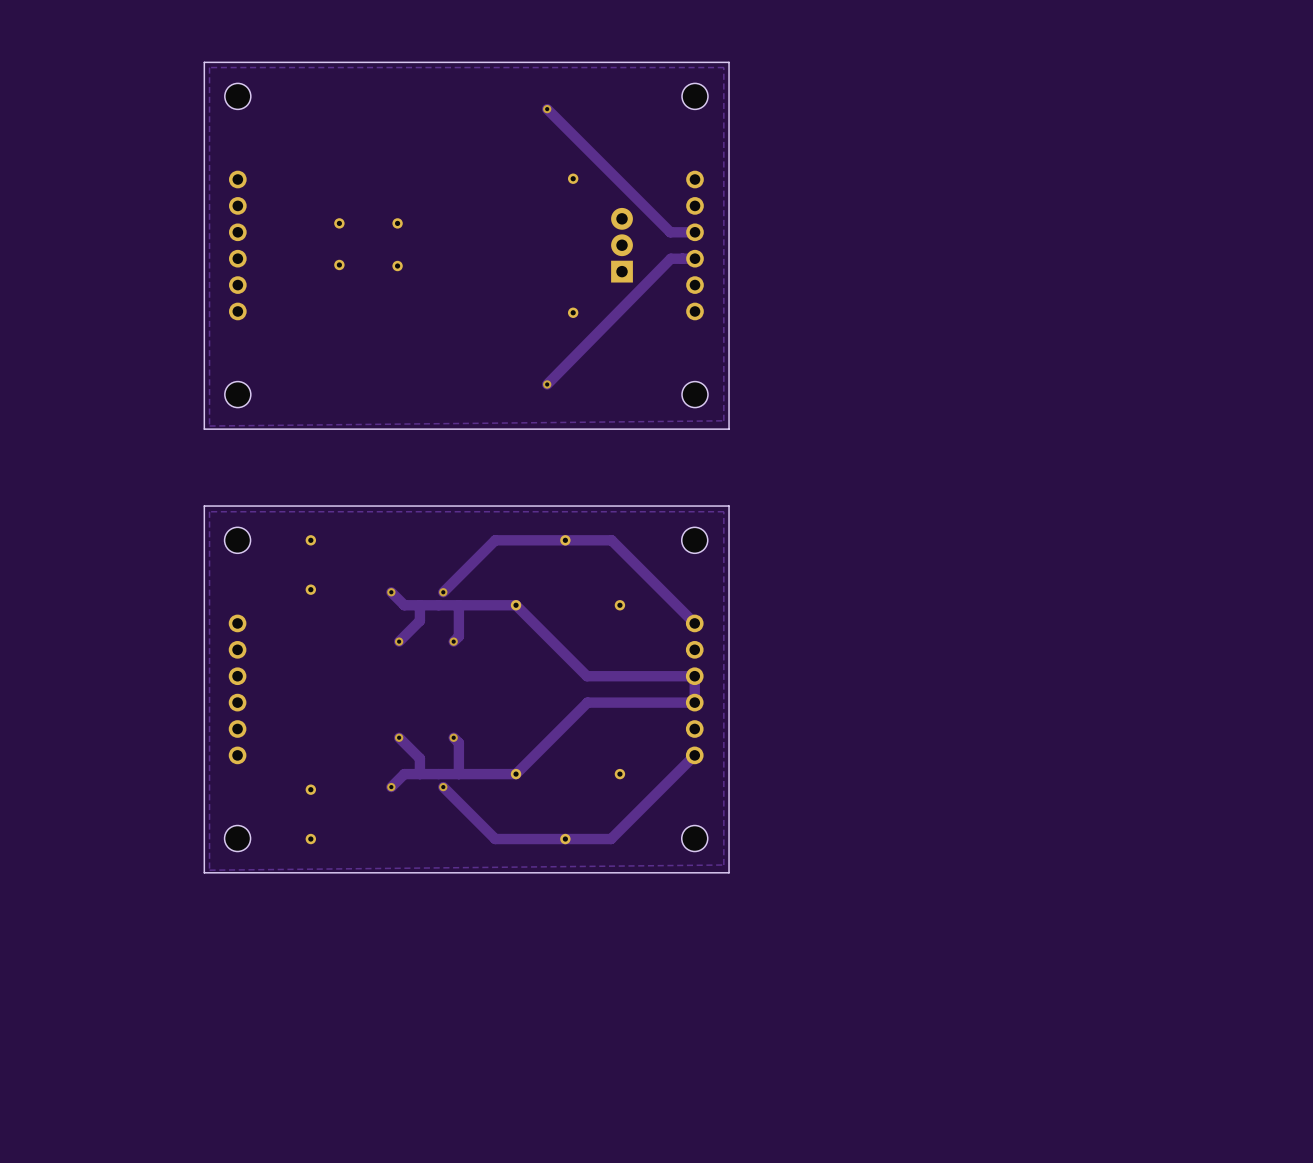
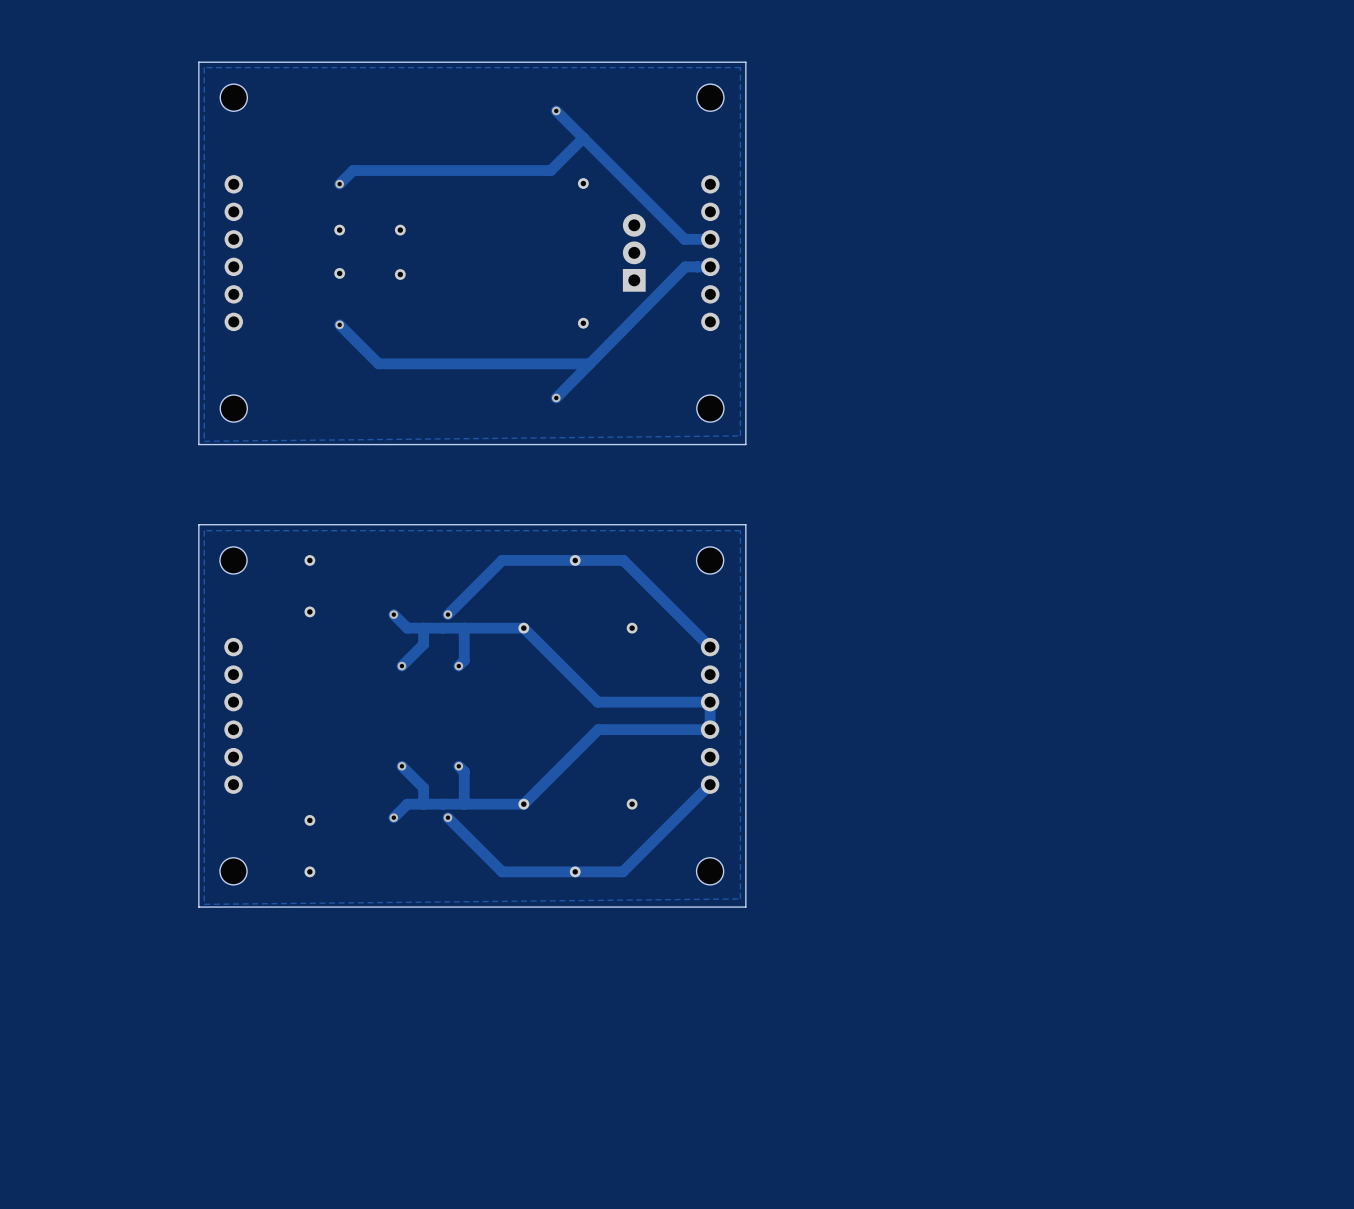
track: none -> (583, 138) (550, 170) (353, 170) (339, 184)
via: none -> (339, 184)
track: none -> (339, 324) (378, 363) (589, 363)
via: none -> (339, 324)

